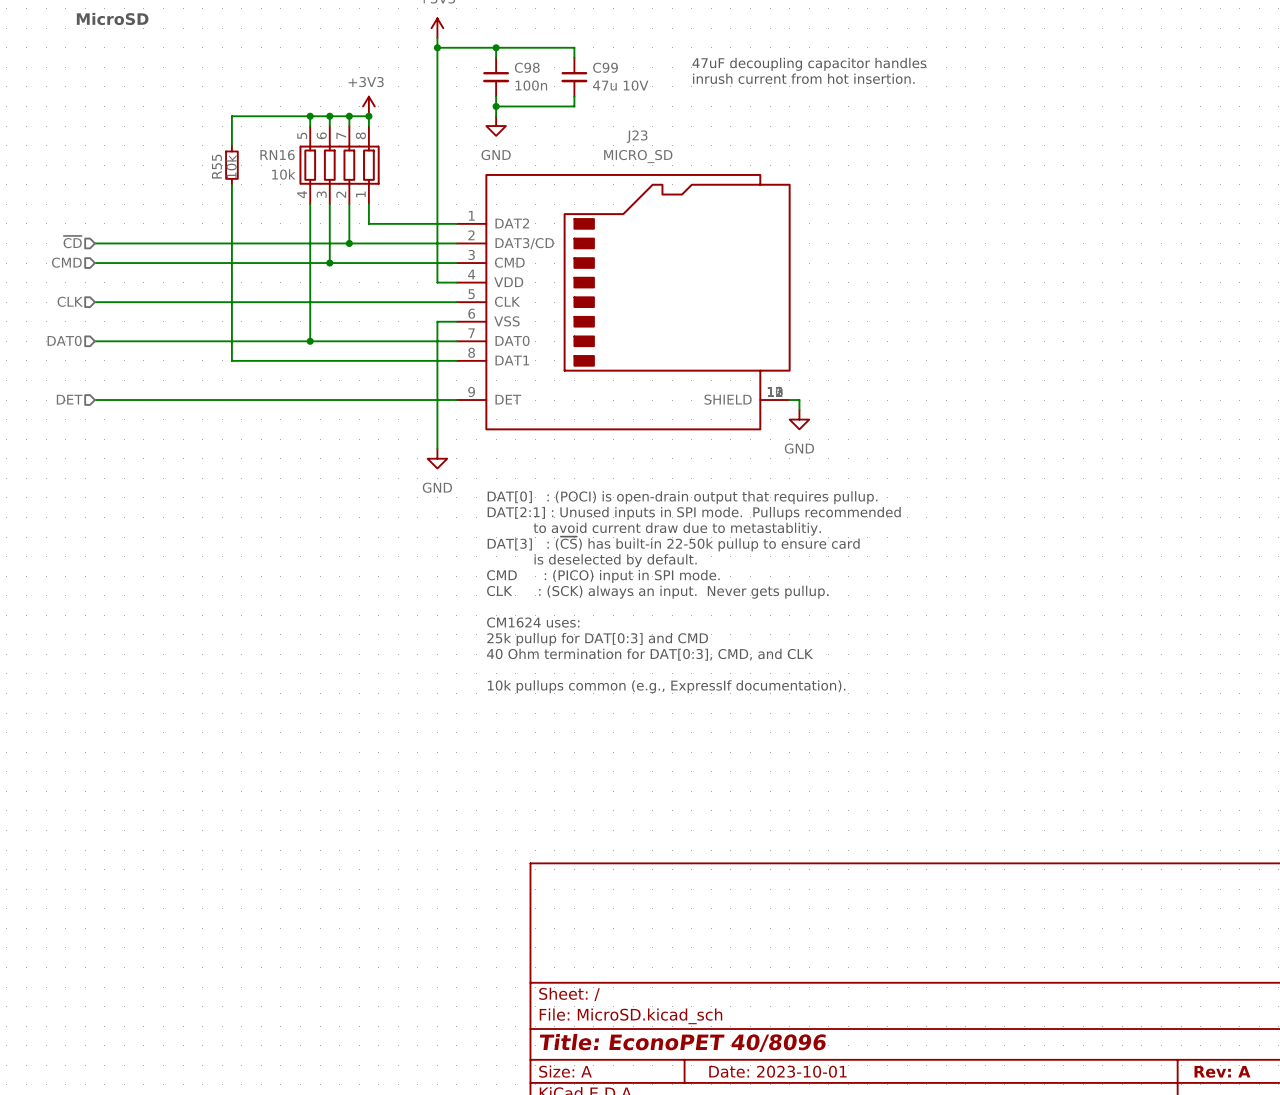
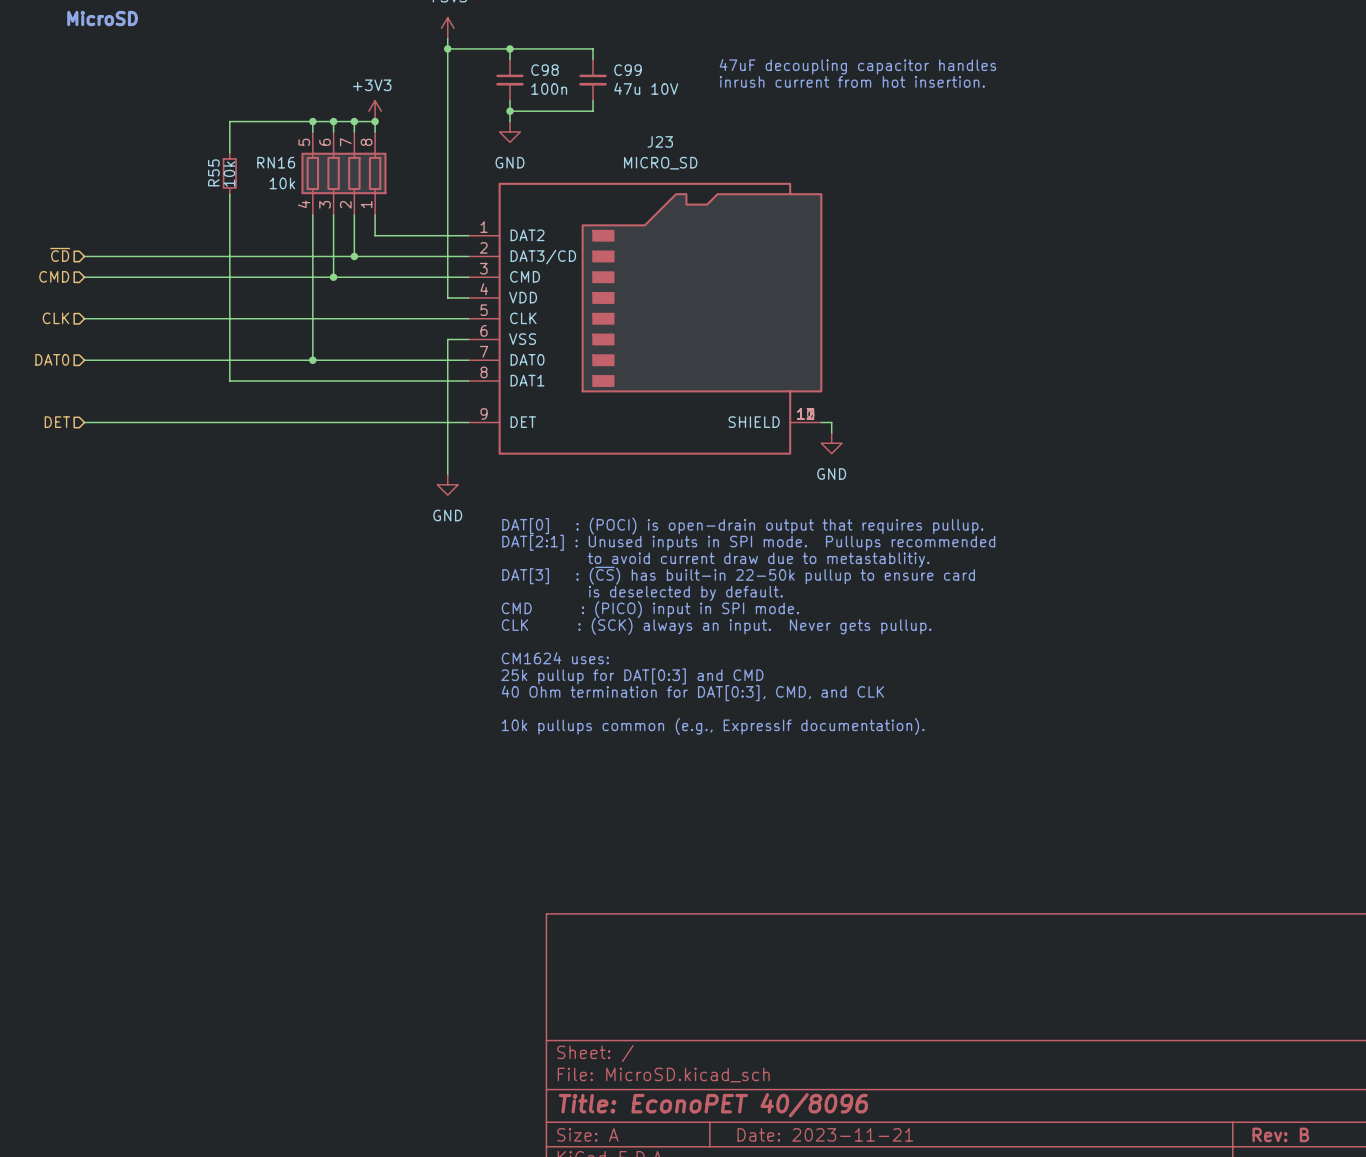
title block: Date: 2023-10-01 (777, 1071) -> Date: 2023-11-21 (825, 1134)
title block: Rev: A (1222, 1071) -> Rev: B (1280, 1134)

